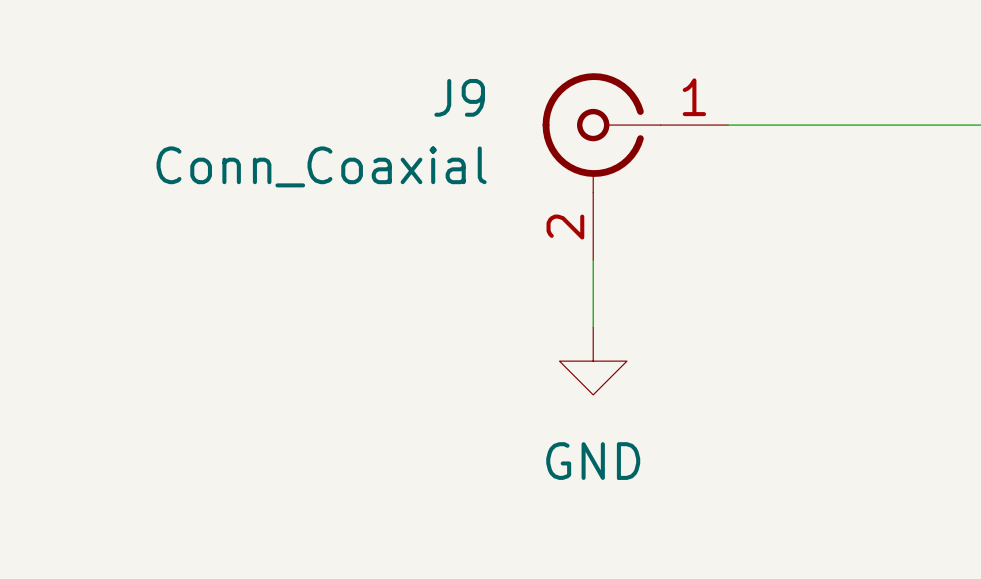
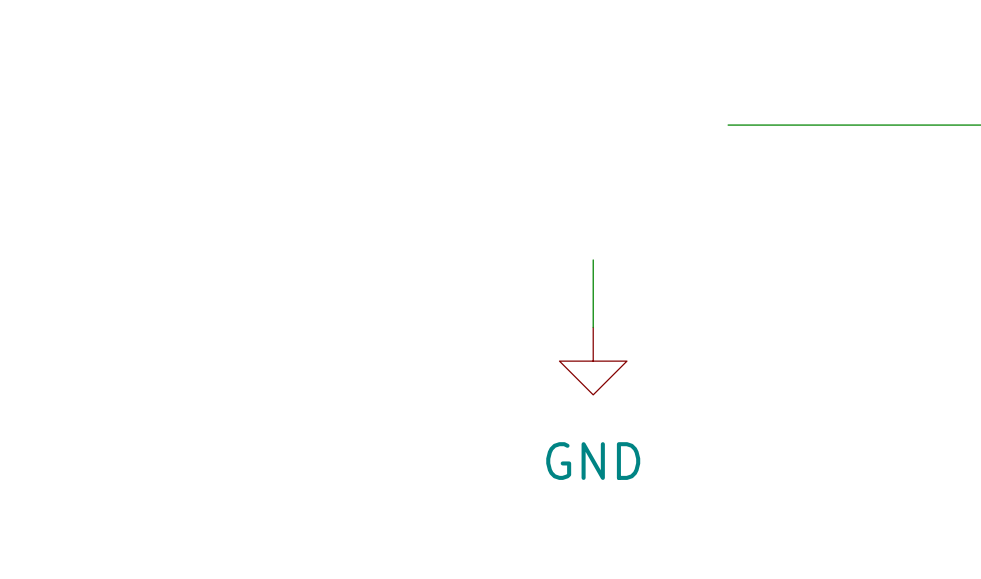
J9: Conn_Coaxial (635, 166) -> none

